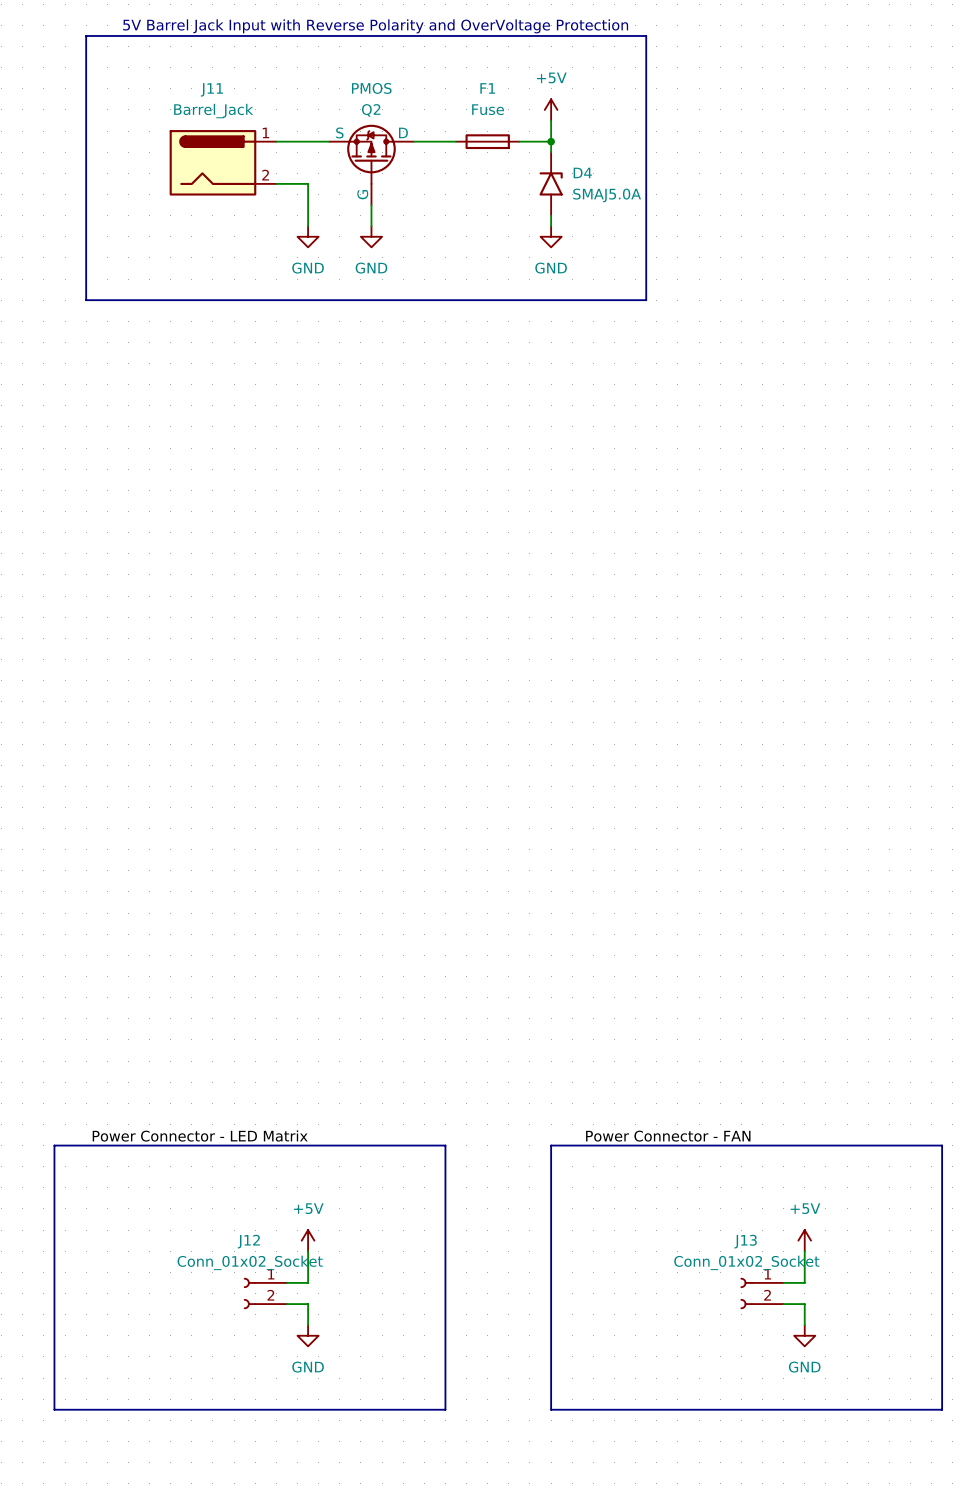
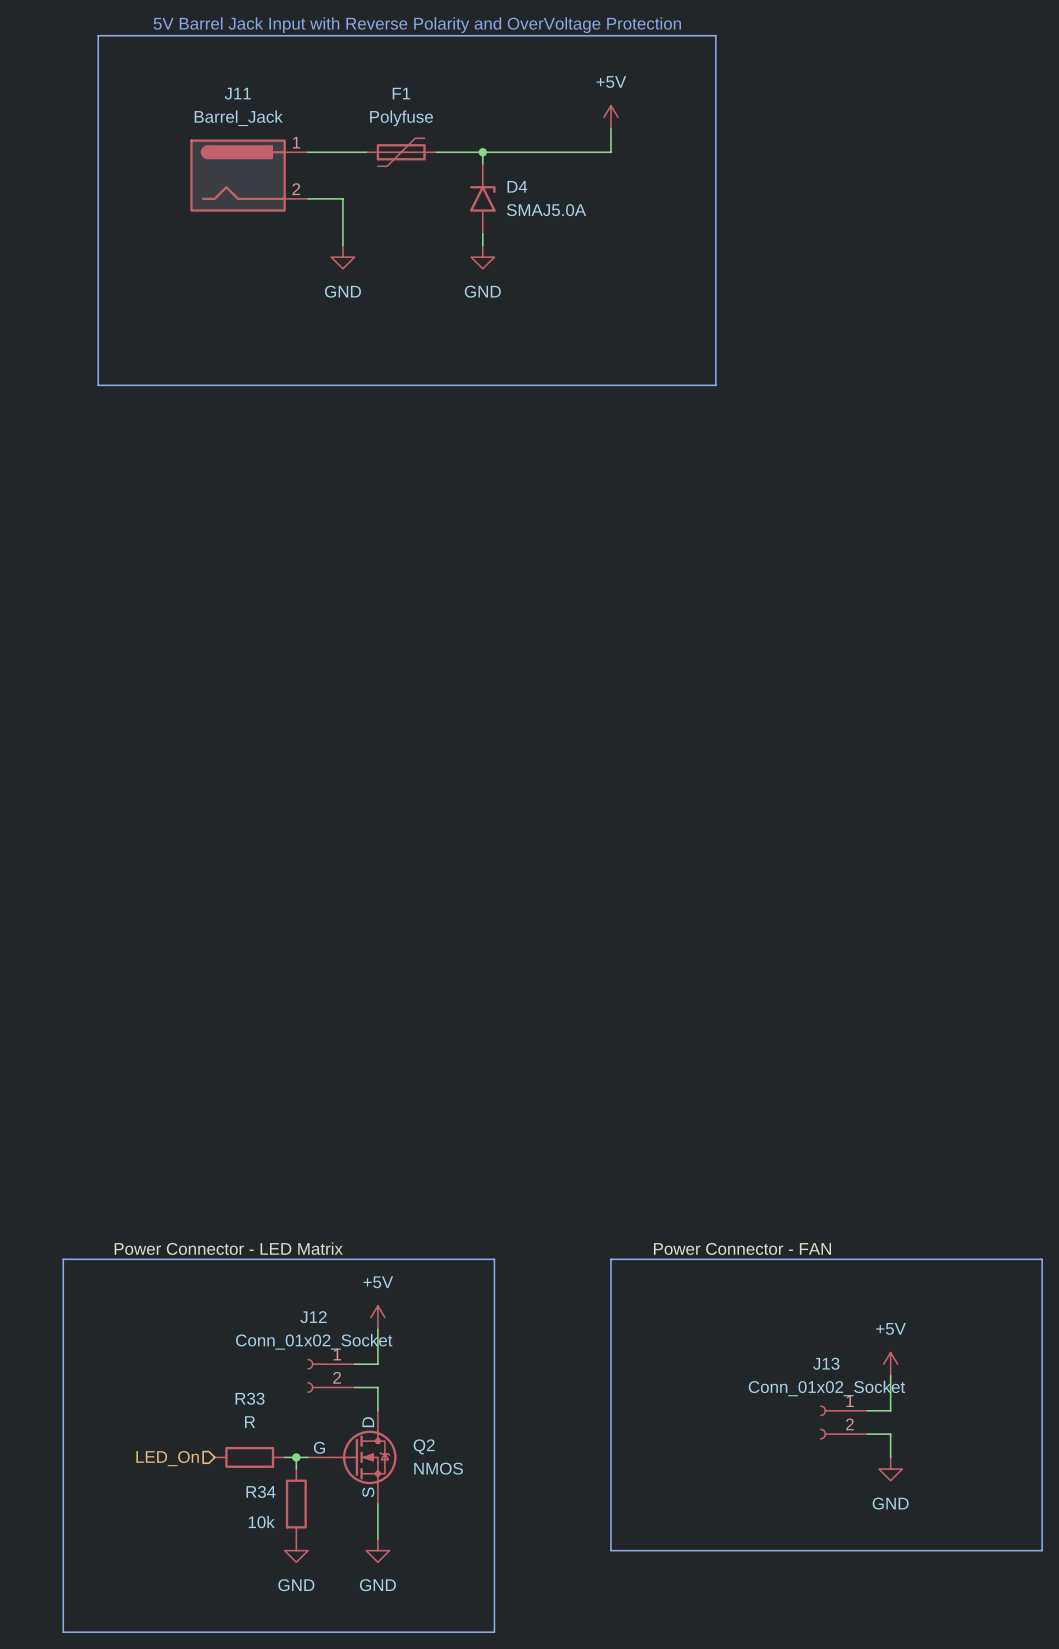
Q2 value: PMOS (371, 88) -> NMOS (438, 1468)
F1 value: Fuse (488, 109) -> Polyfuse (401, 118)
Q2 name position: Q2 (371, 110) -> Q2 (424, 1446)
Q2 symbol: [329, 124, 414, 206] -> [307, 1410, 397, 1505]
F1 symbol: [456, 134, 520, 150] -> [366, 138, 437, 167]
junction: none -> (482, 152)
wire: (551, 141) (551, 152) -> (482, 152) (482, 163)
junction: (551, 141) -> none
D4 position: (551, 183) -> (482, 198)
wire: (371, 205) (371, 226) -> none
wire: (551, 215) (551, 226) -> (482, 233) (482, 245)
power symbol: GND (371, 236) -> none
power symbol: none -> GND (482, 257)
power symbol: GND (551, 236) -> none
line: (86, 300) (646, 300) -> (98, 327) (98, 385) (715, 385) (715, 327)
power symbol position: +5V (308, 1240) -> +5V (377, 1317)
wire: (308, 1251) (308, 1282) (286, 1282) -> (377, 1329) (377, 1364) (354, 1364)
J12 position: (265, 1293) -> (330, 1375)
wire: (286, 1304) (308, 1304) (308, 1325) -> (354, 1387) (377, 1387) (377, 1410)
R33: none -> R (249, 1457)
wire: none -> (284, 1457) (307, 1457)
wire: none -> (296, 1457) (296, 1469)
junction: none -> (296, 1457)
hierarchical label: none -> LED_On (167, 1458)
power symbol: GND (308, 1335) -> none
R34: none -> 10k (296, 1504)
wire: none -> (377, 1504) (377, 1538)
line: (54, 1409) (445, 1409) -> (63, 1550) (63, 1632) (494, 1632) (494, 1550)
power symbol: none -> GND (296, 1550)
power symbol: none -> GND (377, 1550)

